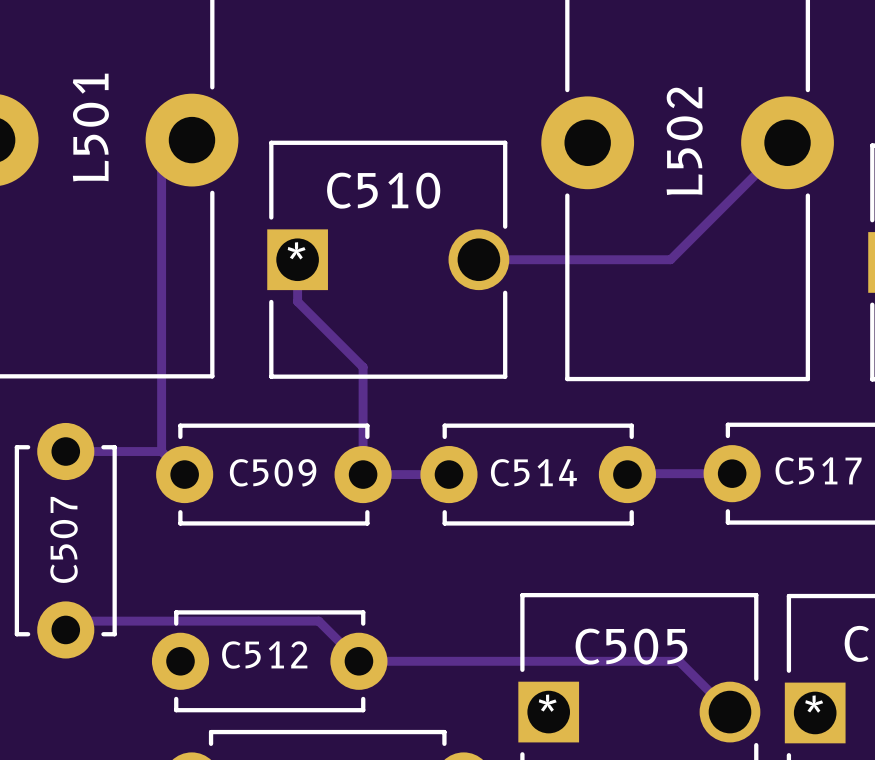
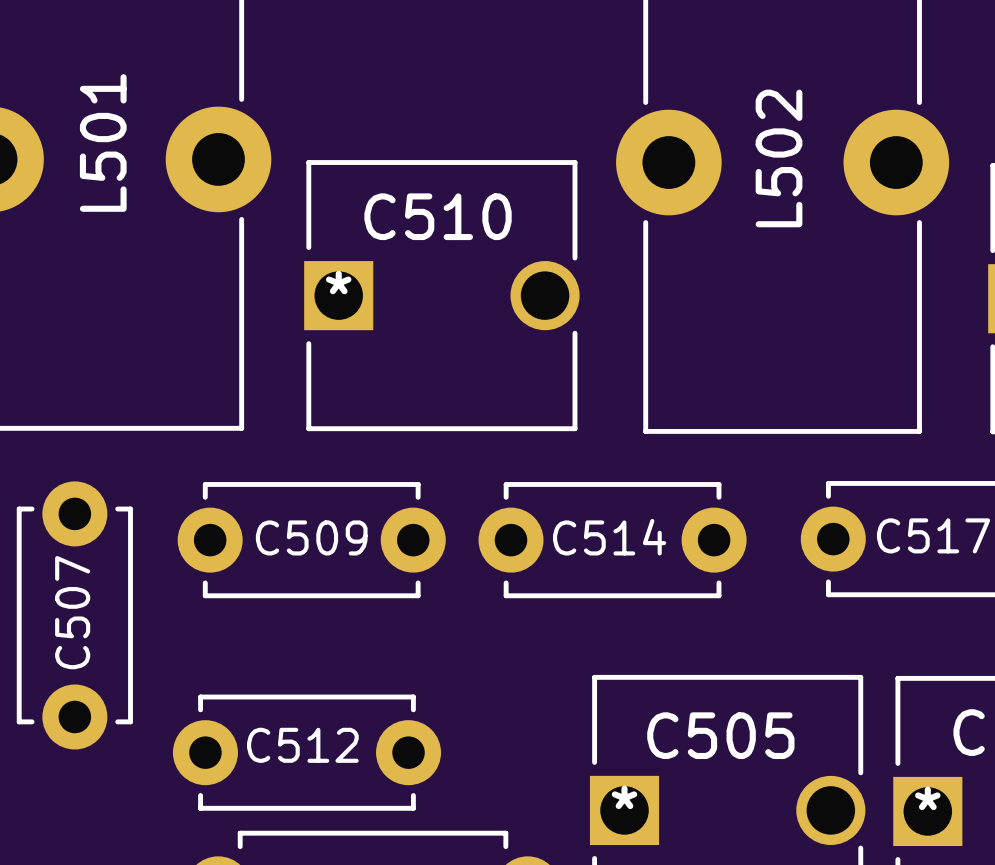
track: (191, 140) (161, 170) (161, 451) -> none
track: (787, 142) (670, 259) (478, 259) -> none
track: (297, 259) (297, 301) (363, 367) (363, 474) (448, 474) -> none
track: (65, 451) (161, 451) -> none
track: (732, 473) (627, 474) -> none
track: (65, 629) (74, 621) (318, 621) (358, 661) (679, 661) (729, 712) -> none

